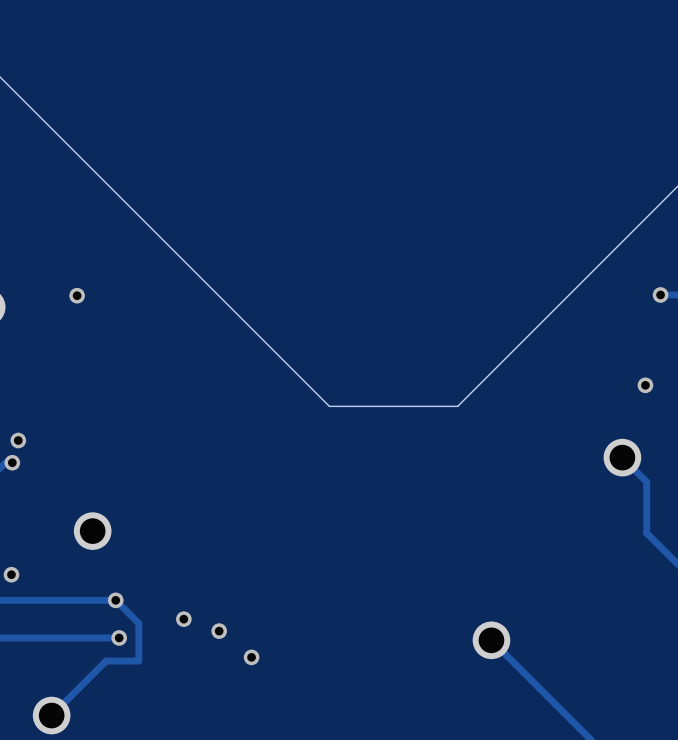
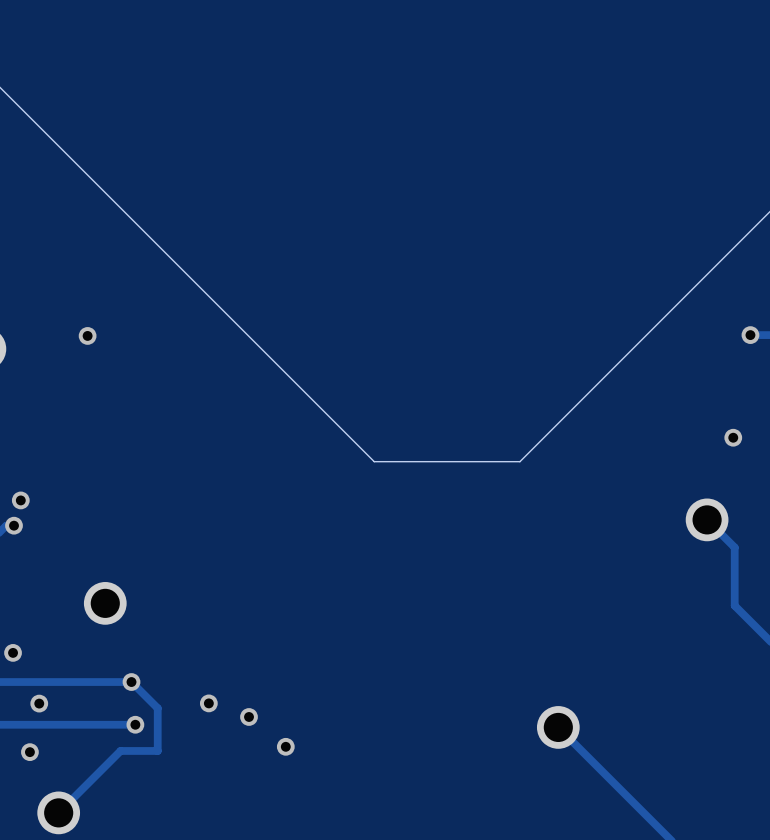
via: none -> (39, 703)
via: none -> (29, 752)

